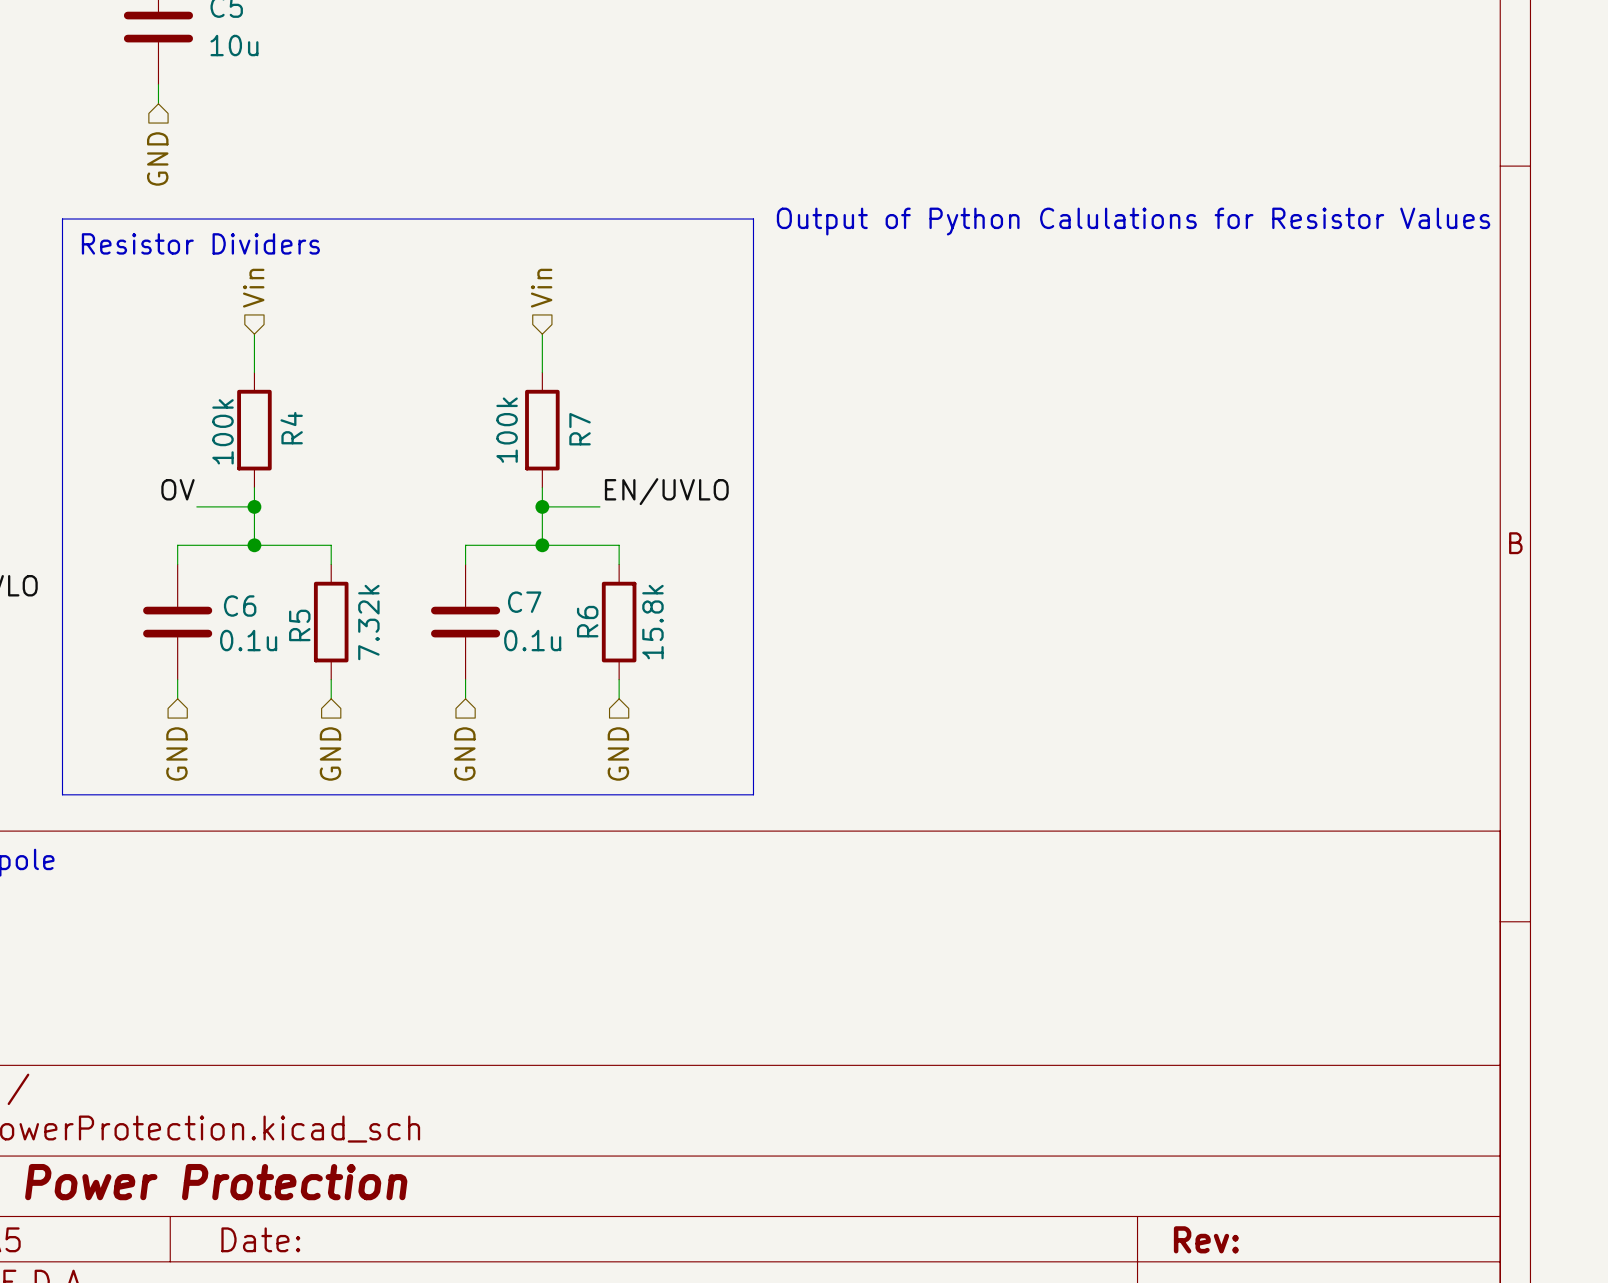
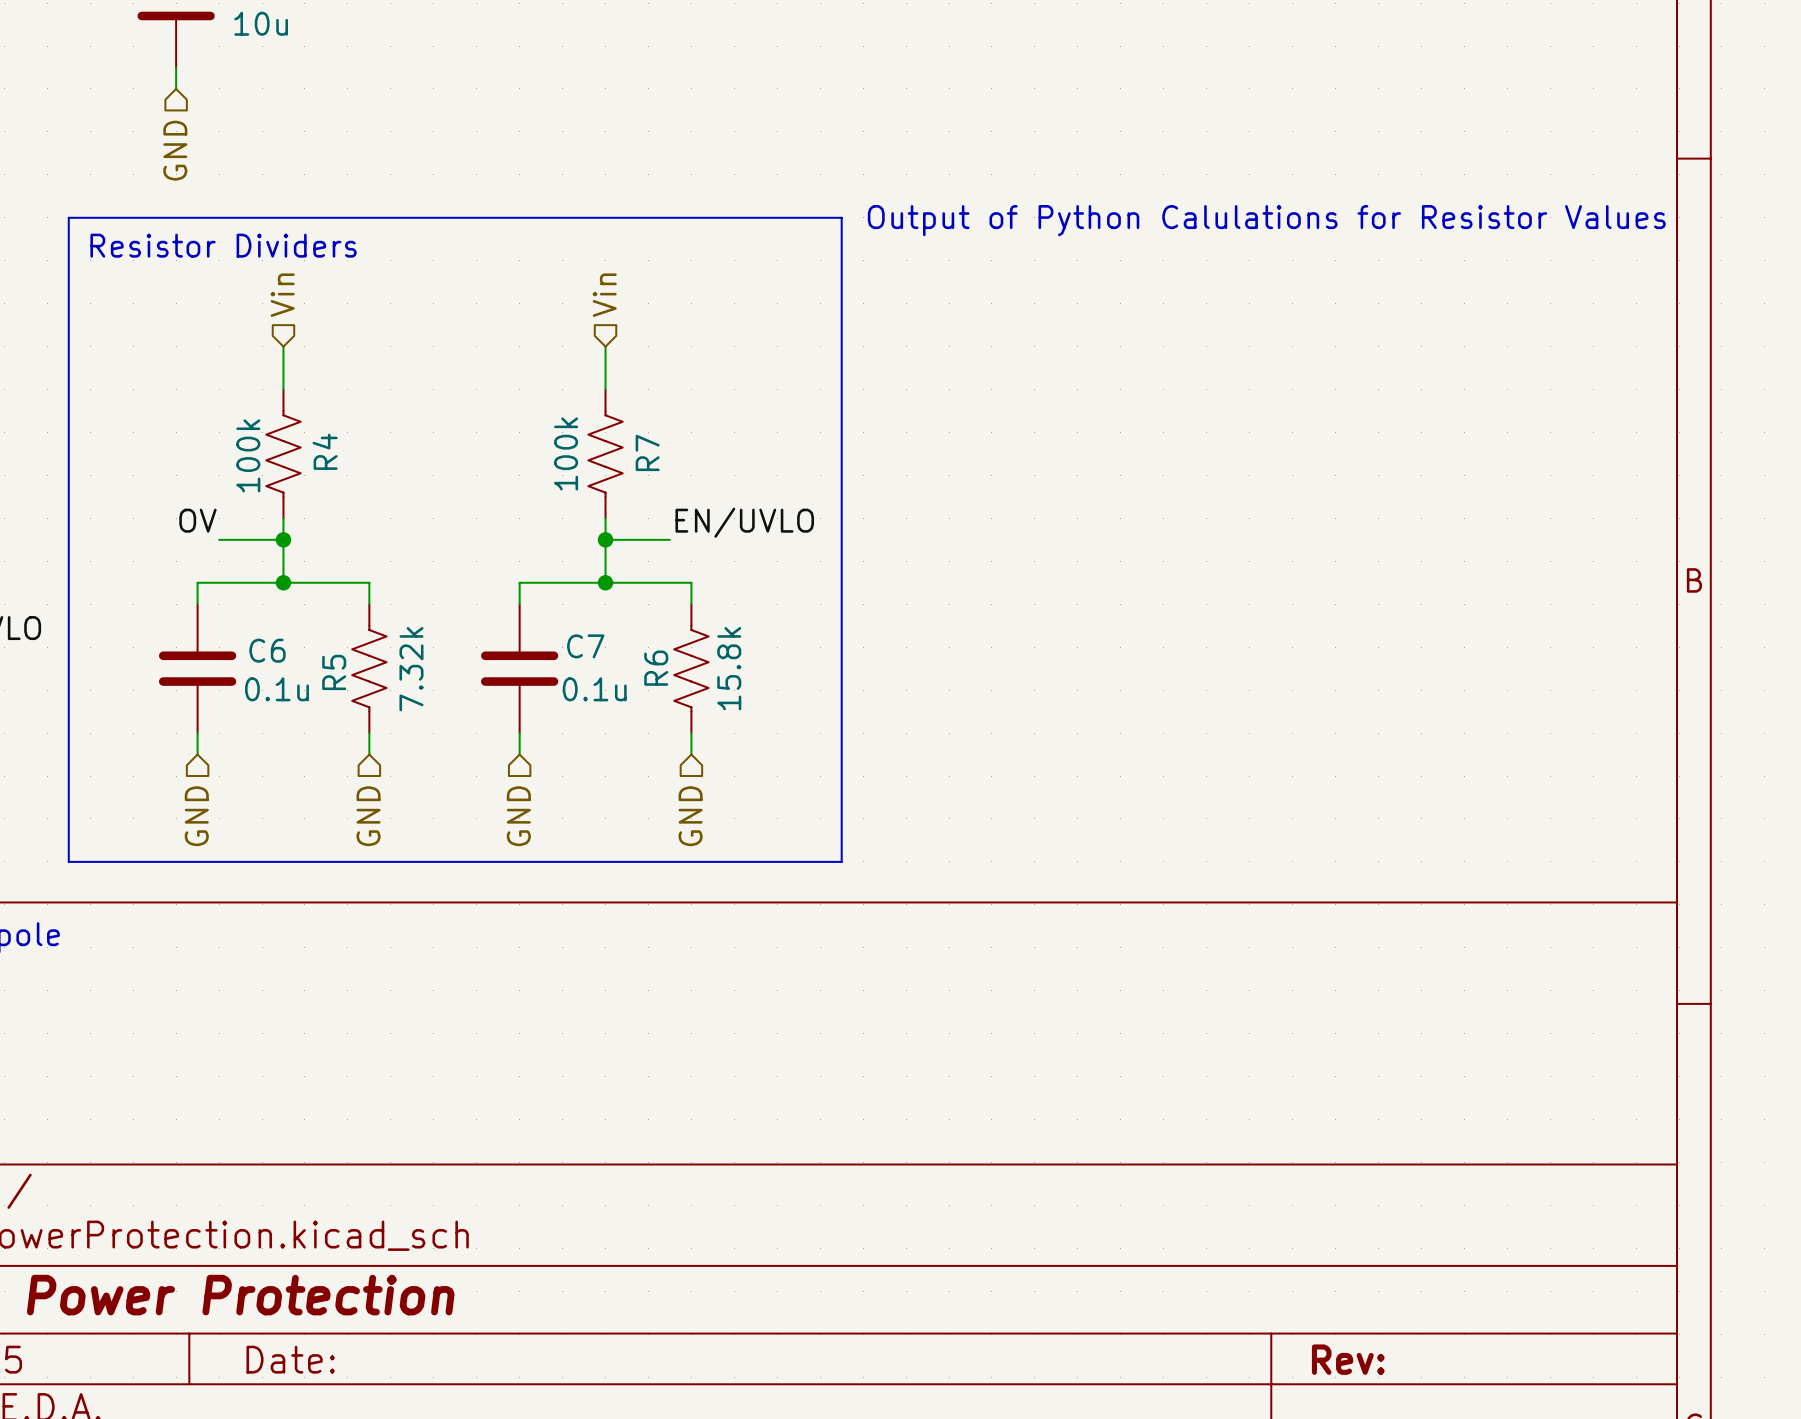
R4 symbol: [237, 372, 272, 488] -> [266, 389, 301, 519]
R7 symbol: [525, 372, 560, 488] -> [588, 389, 623, 519]
R5 symbol: [313, 564, 349, 680] -> [352, 604, 387, 734]
R6 symbol: [601, 564, 637, 680] -> [674, 604, 709, 734]

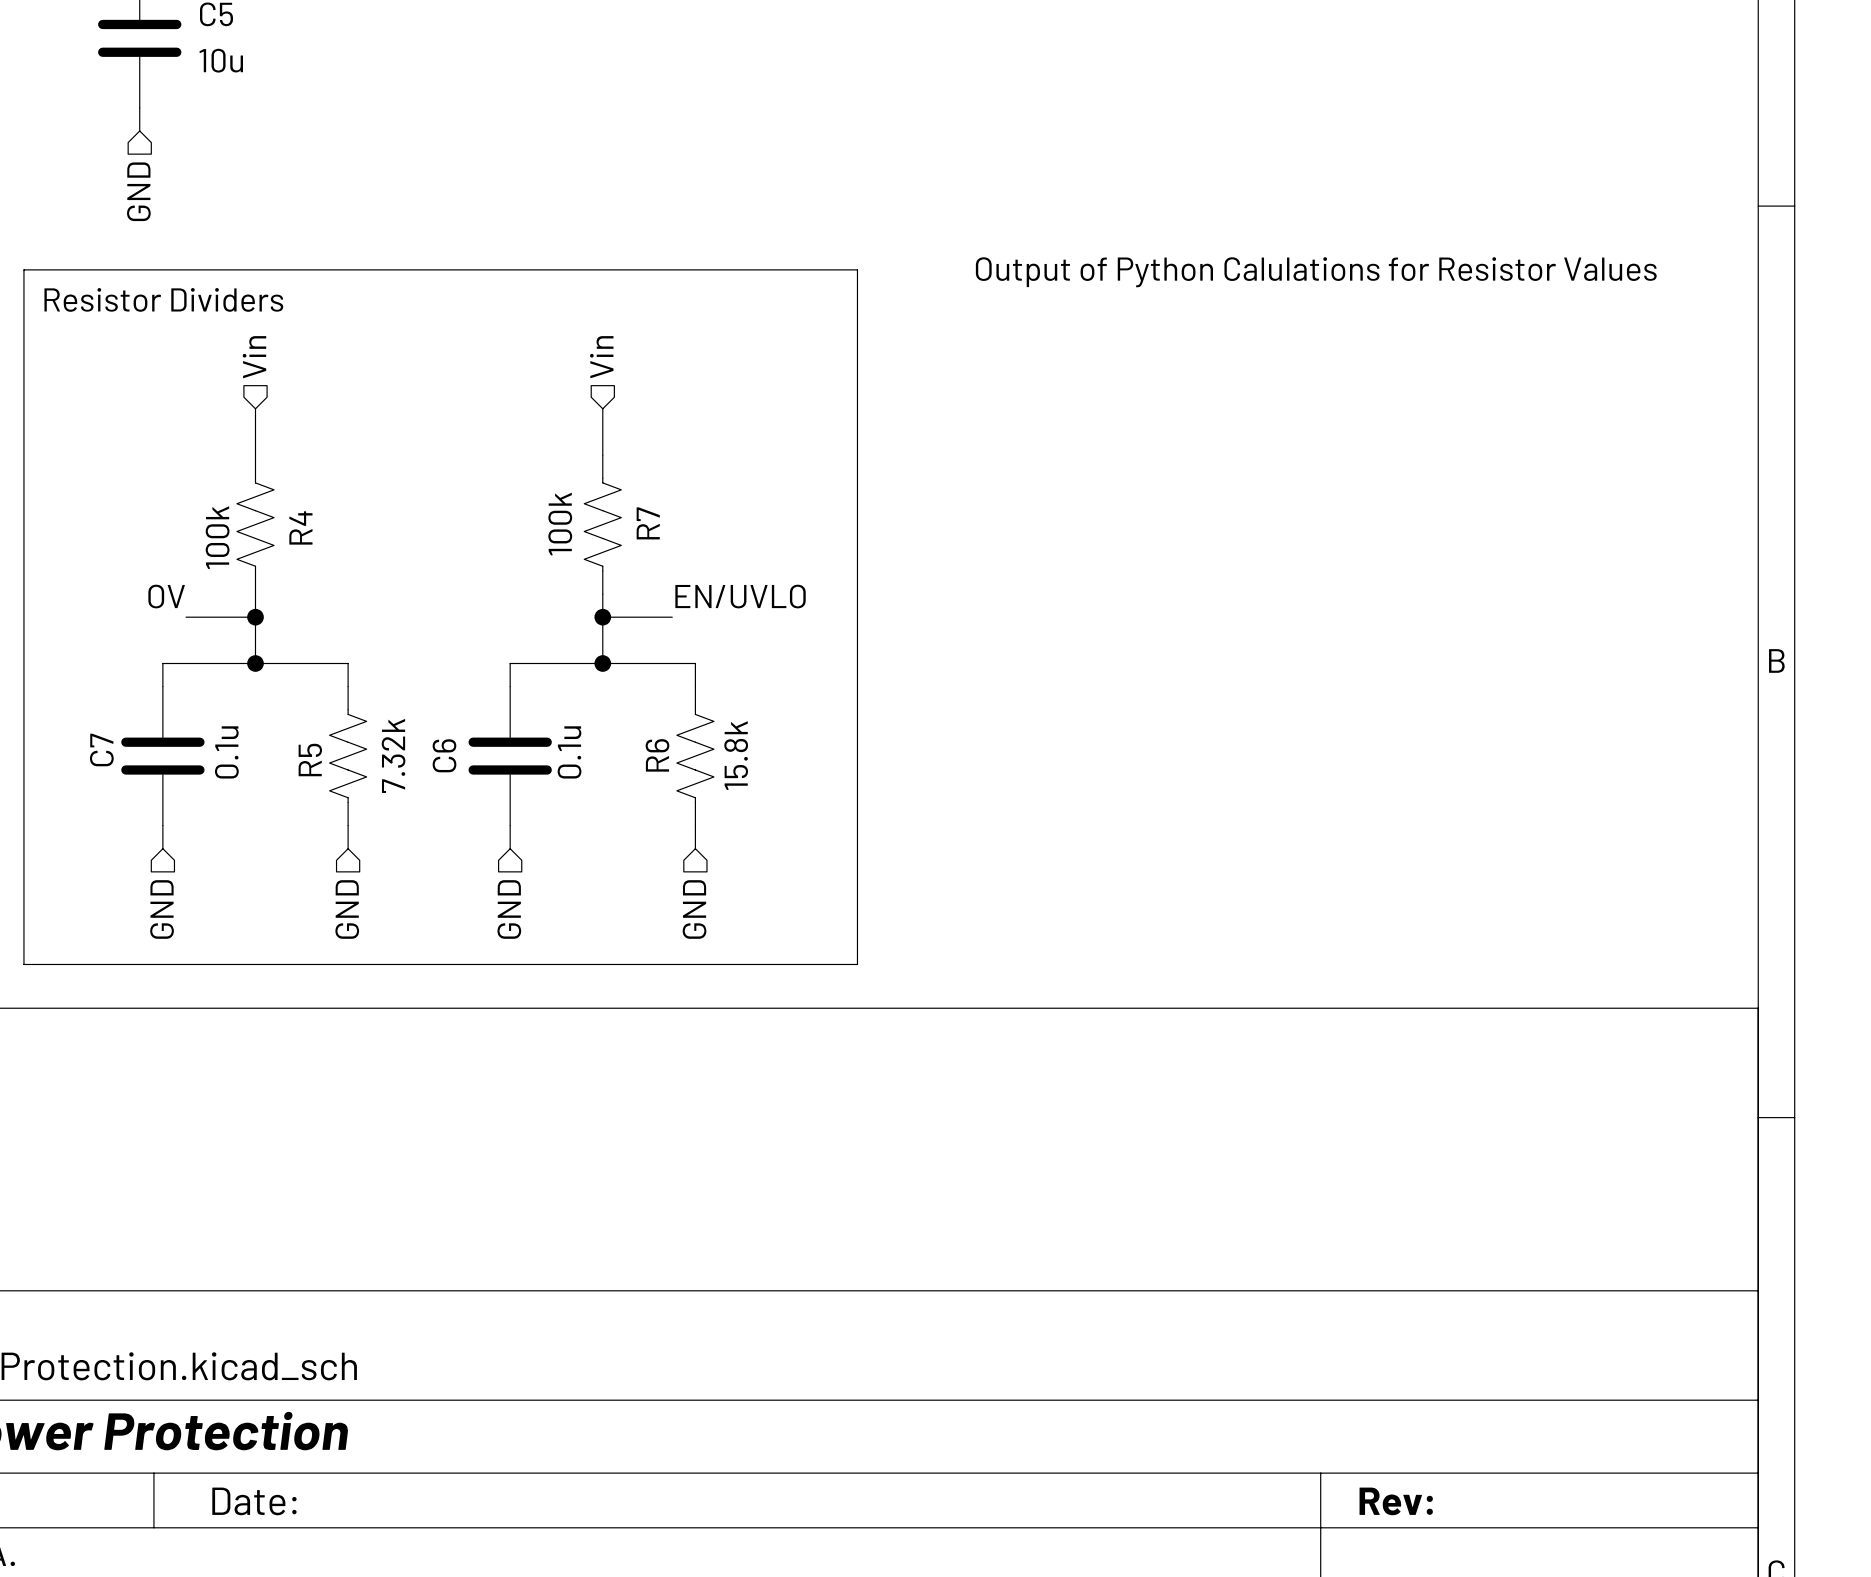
C7 name: C7 (585, 646) -> C6 (444, 755)
C6 name: C6 (267, 650) -> C7 (101, 749)
C6 value rotation: 0° (276, 689) -> 90° counterclockwise (226, 752)
C7 value rotation: 0° (594, 689) -> 90° counterclockwise (569, 752)

